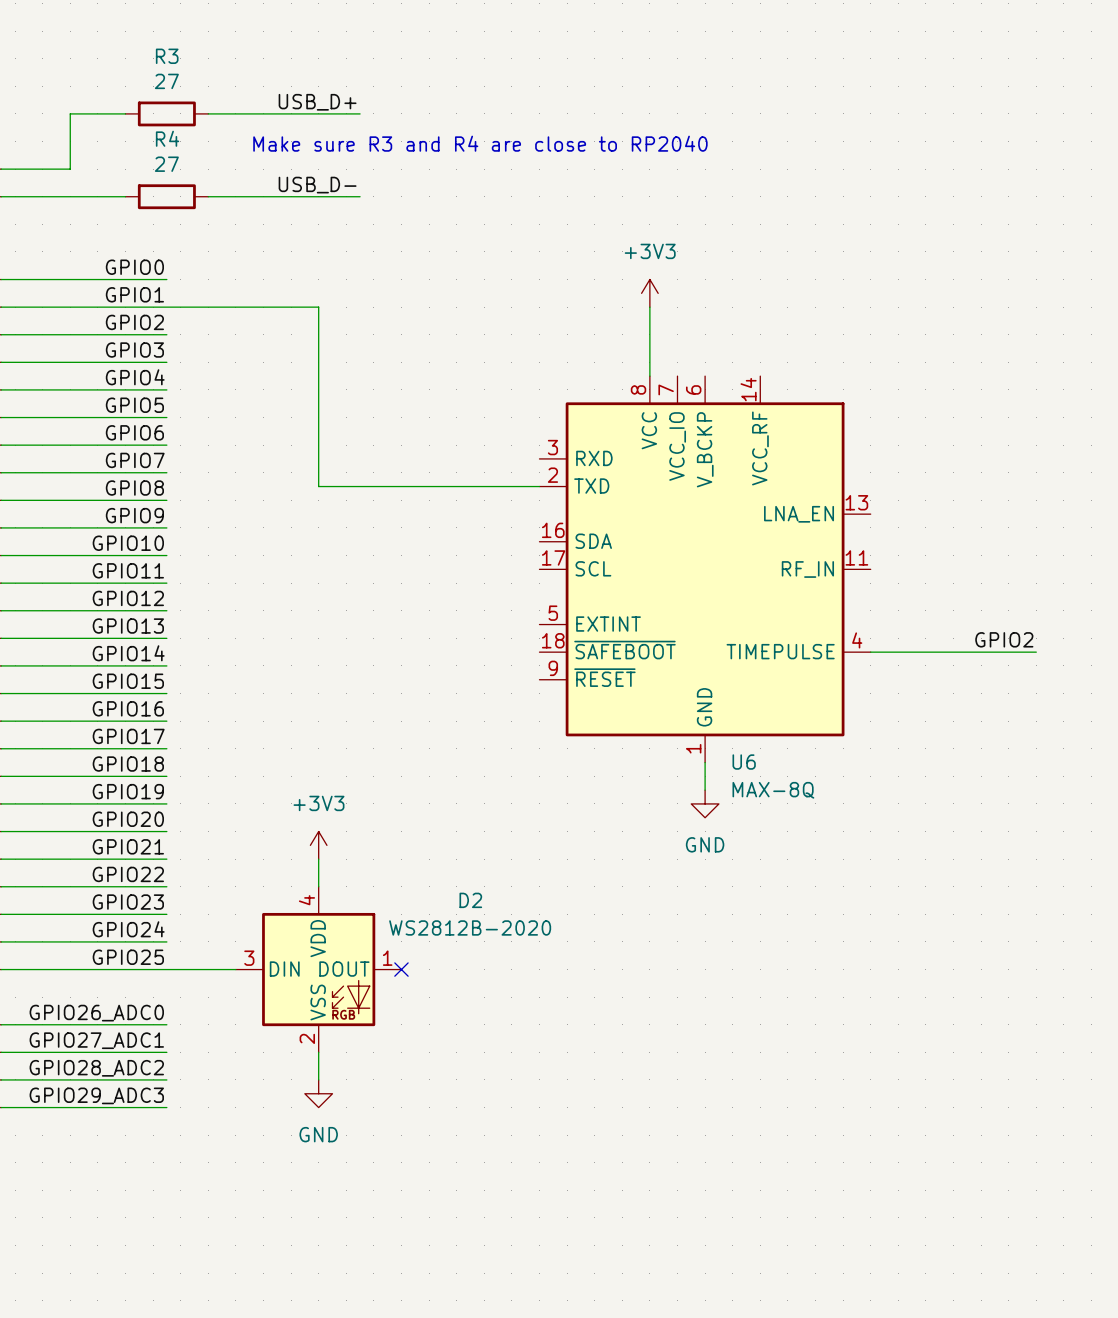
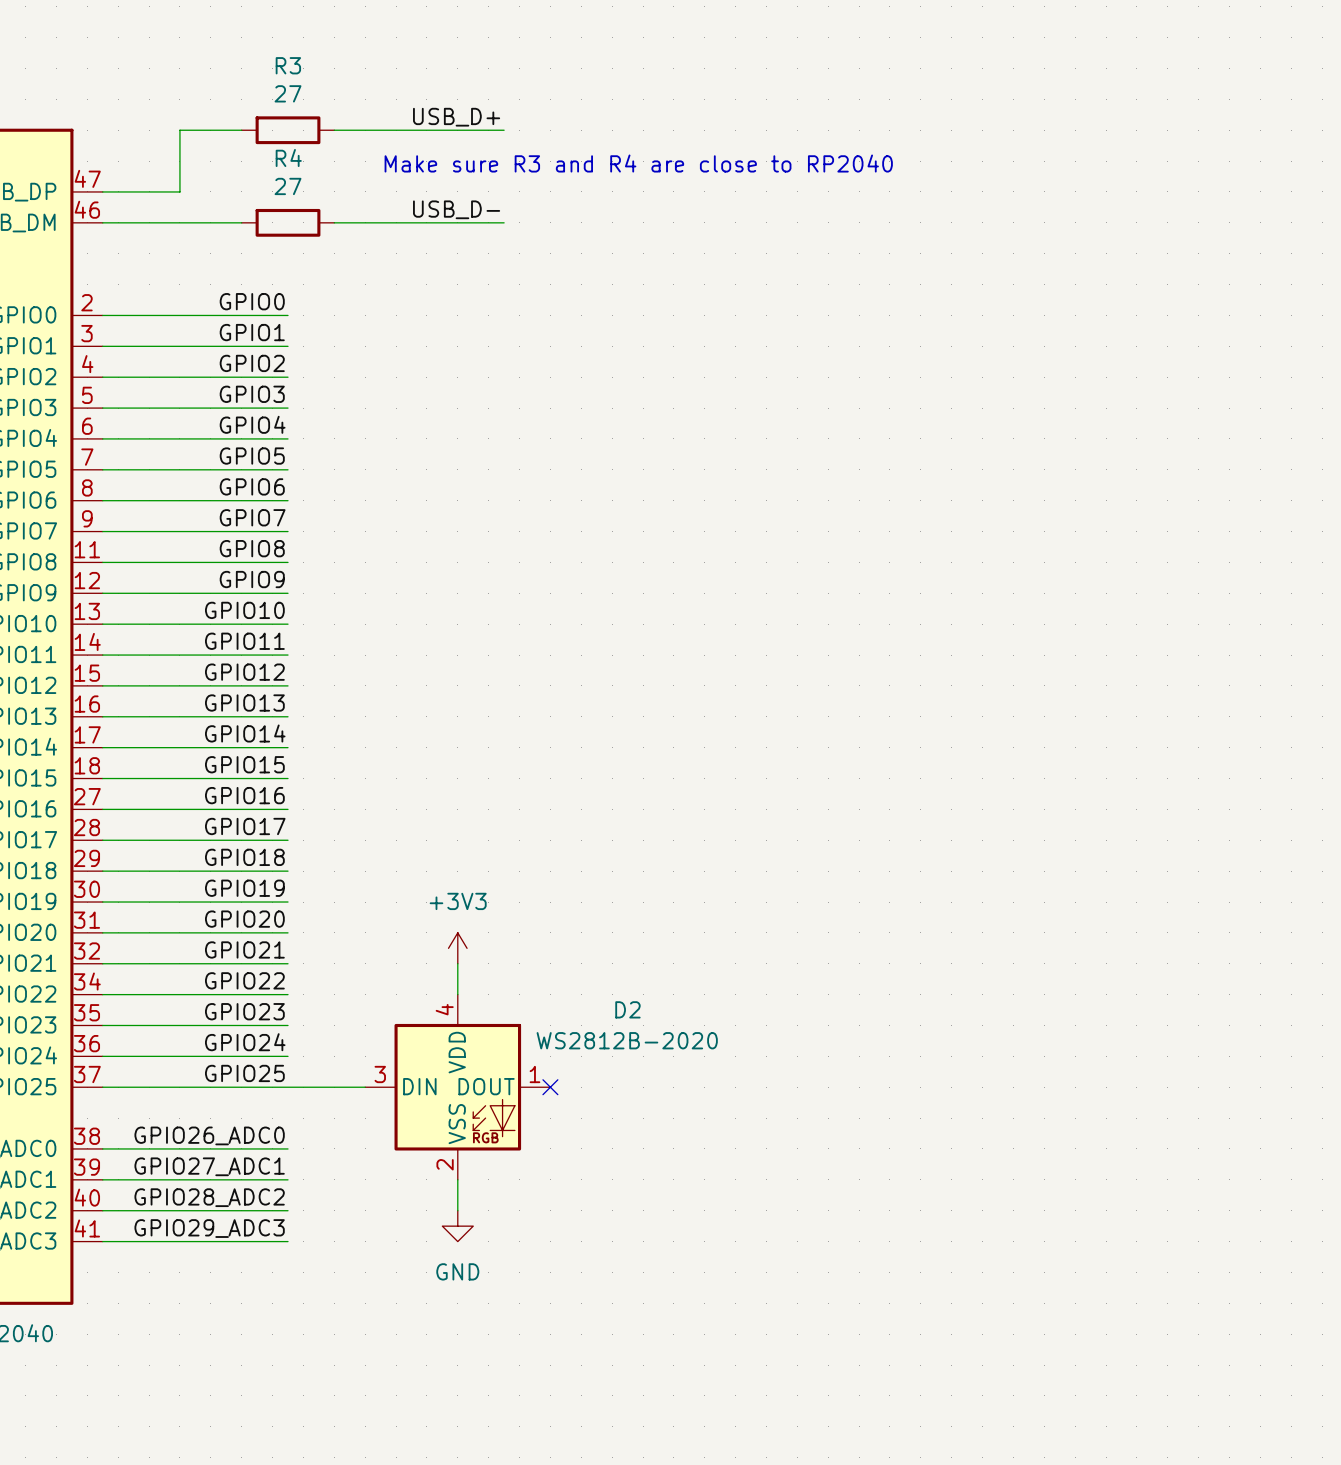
power symbol: +3V3 (649, 293) -> none
wire: (166, 307) (318, 307) (318, 486) (539, 486) -> none
wire: (649, 307) (649, 376) -> none
U6: MAX-8Q (705, 569) -> none
label: GPIO2 (1004, 639) -> none
wire: (870, 652) (1036, 652) -> none
wire: (705, 762) (705, 790) -> none
power symbol: GND (705, 803) -> none

